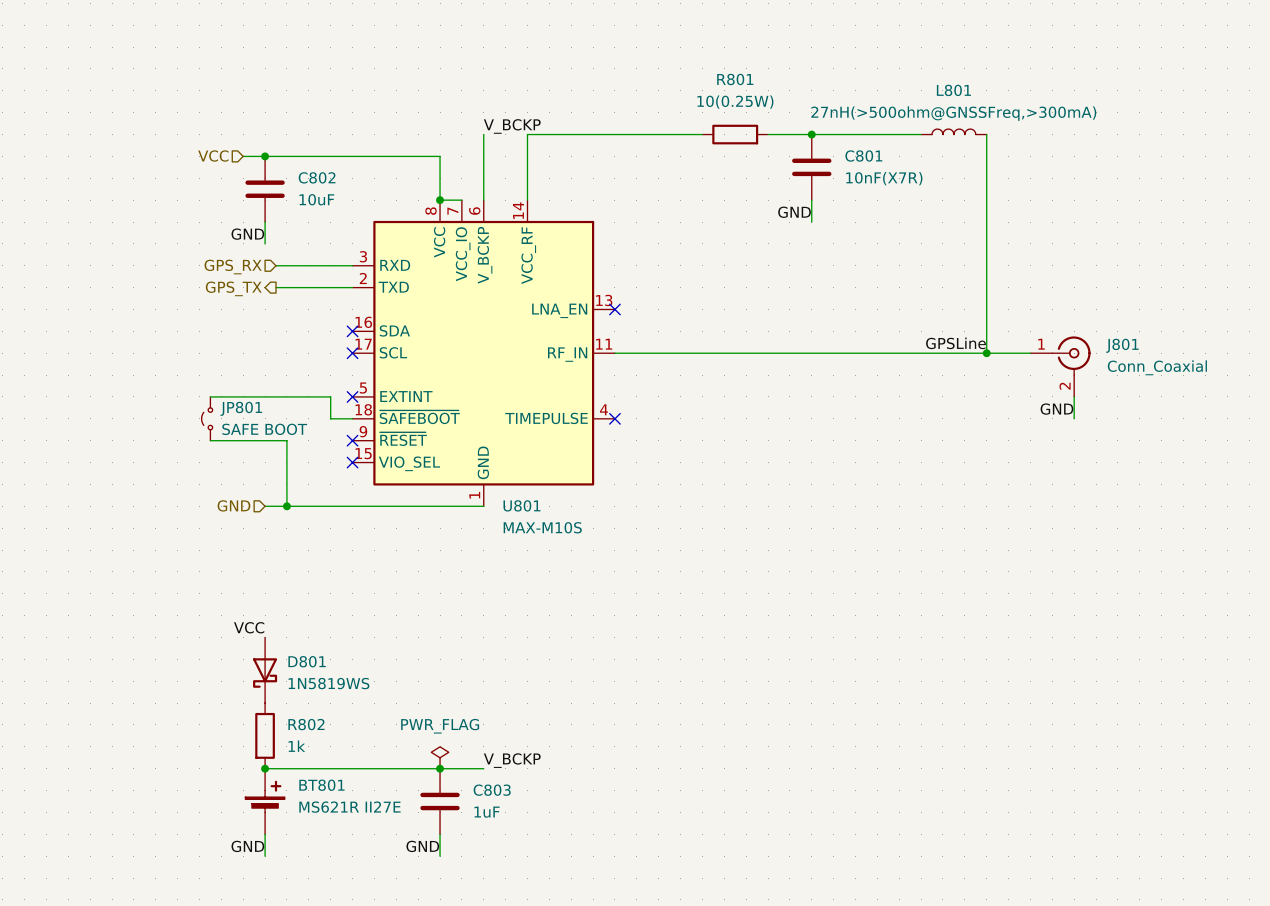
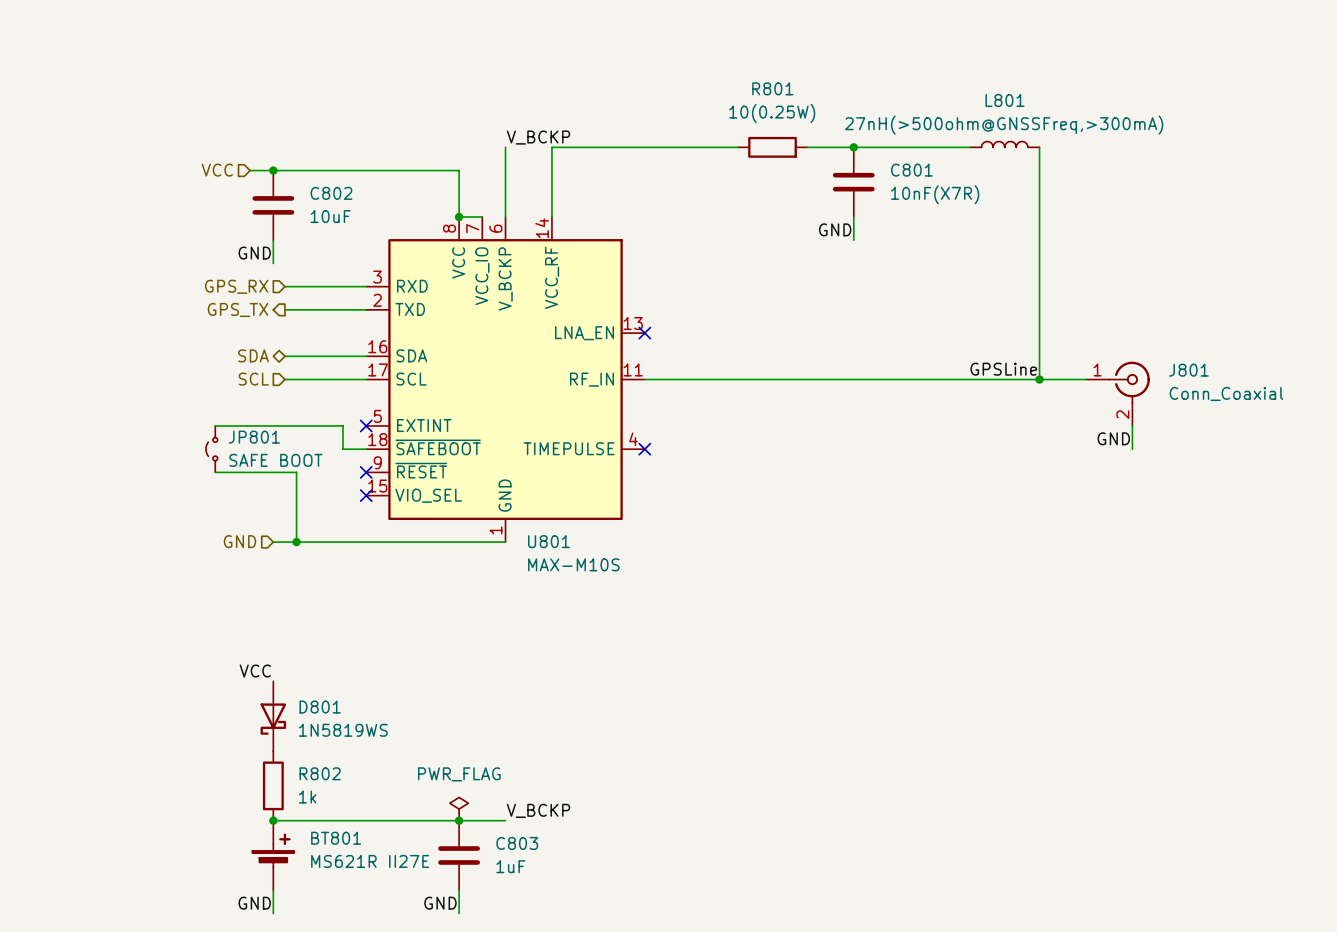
hierarchical label: none -> SDA (253, 355)
wire: none -> (284, 356) (366, 356)
no-connect mark: (352, 331) -> none
hierarchical label: none -> SCL (253, 379)
wire: none -> (284, 379) (366, 379)
no-connect mark: (352, 353) -> none

